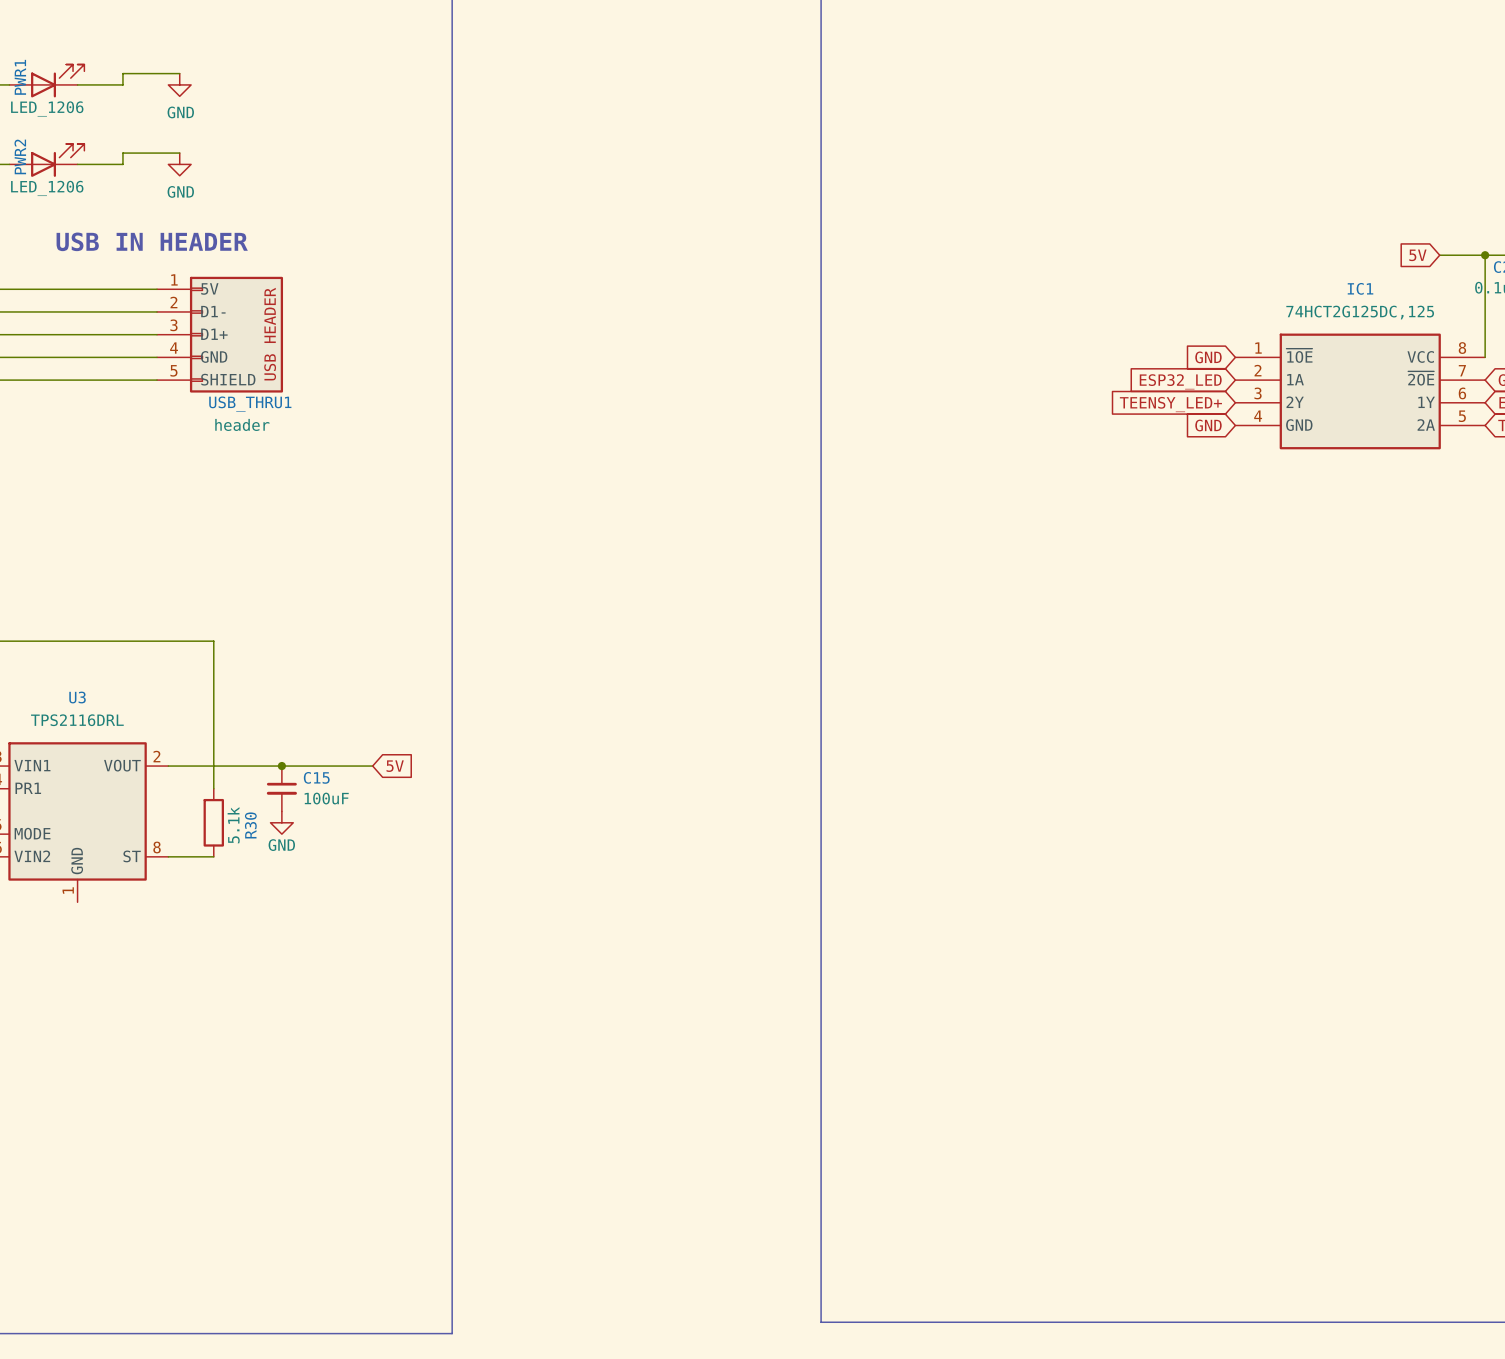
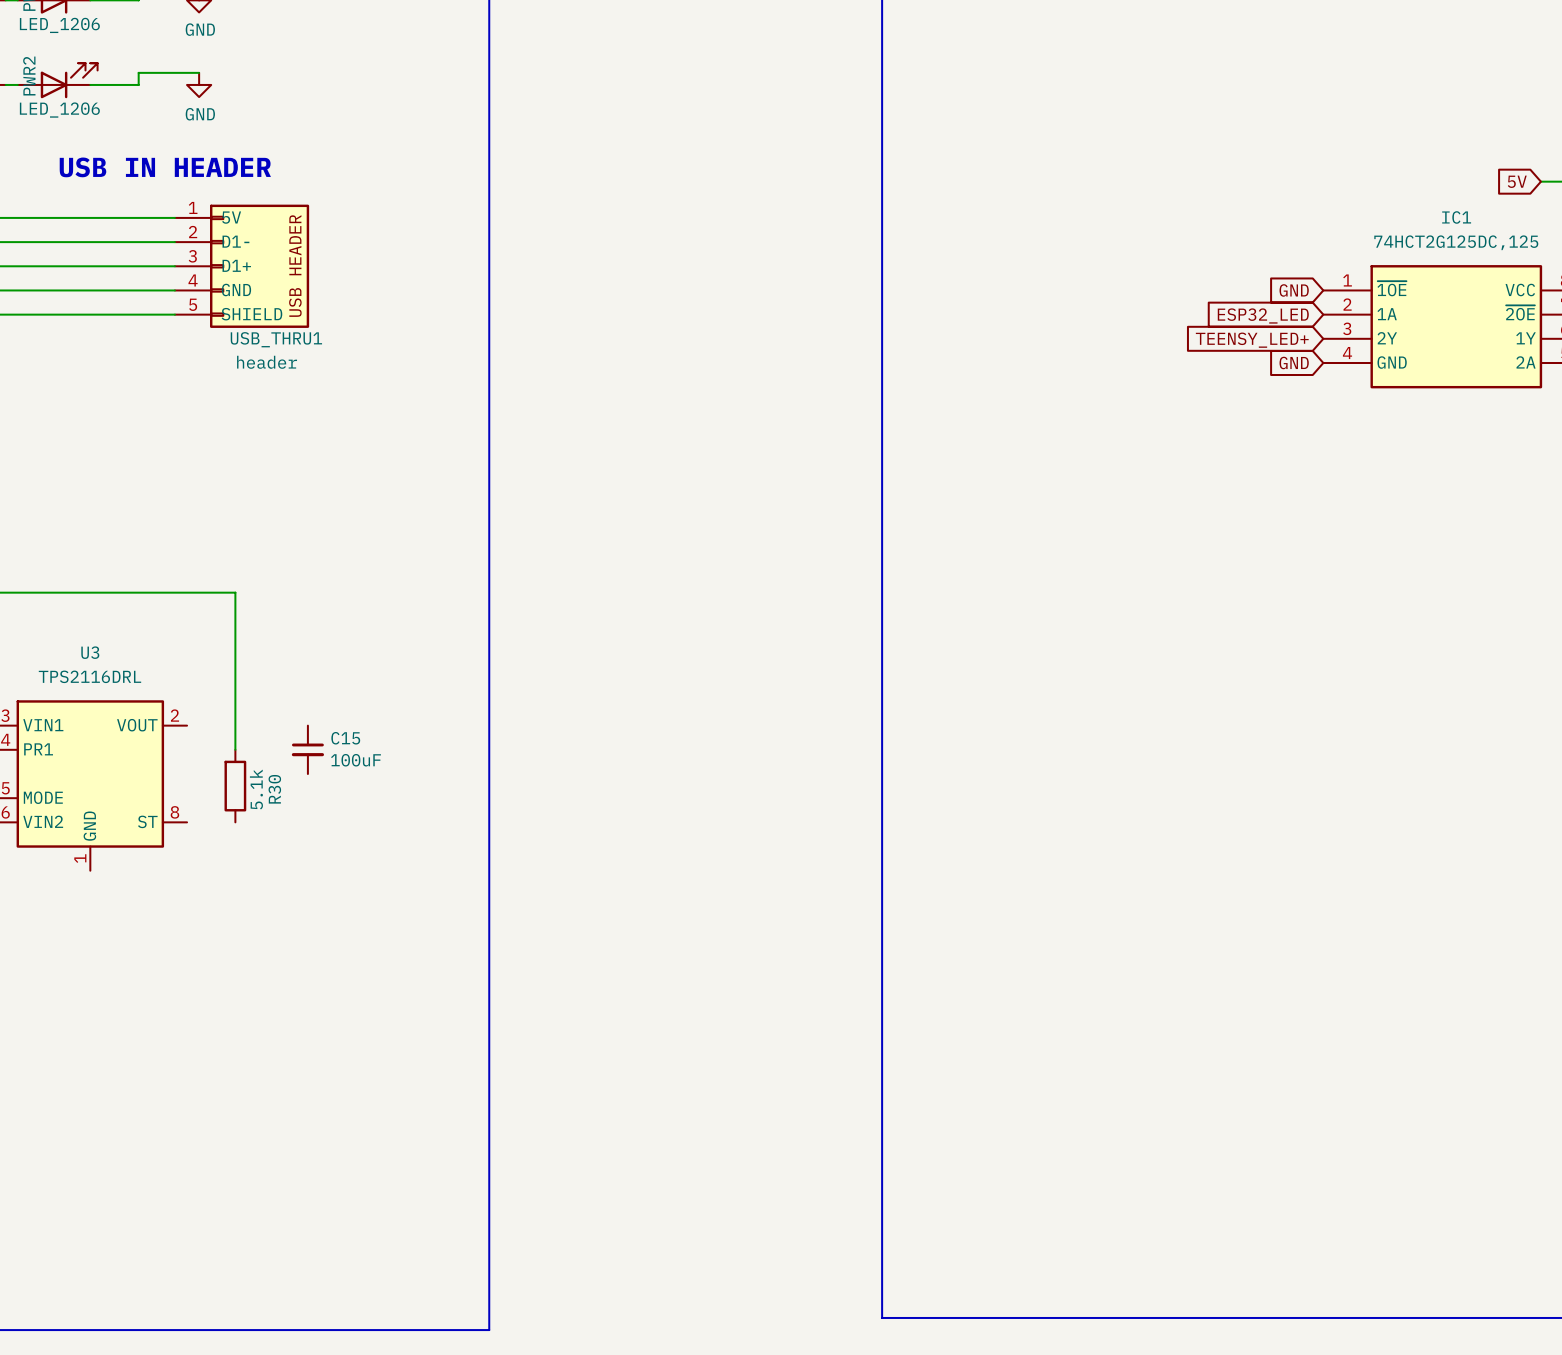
wire: (168, 766) (372, 766) -> none
junction: (281, 766) -> none
global label: 5V (395, 766) -> none
power symbol: GND (281, 822) -> none
wire: (168, 856) (213, 856) -> none

